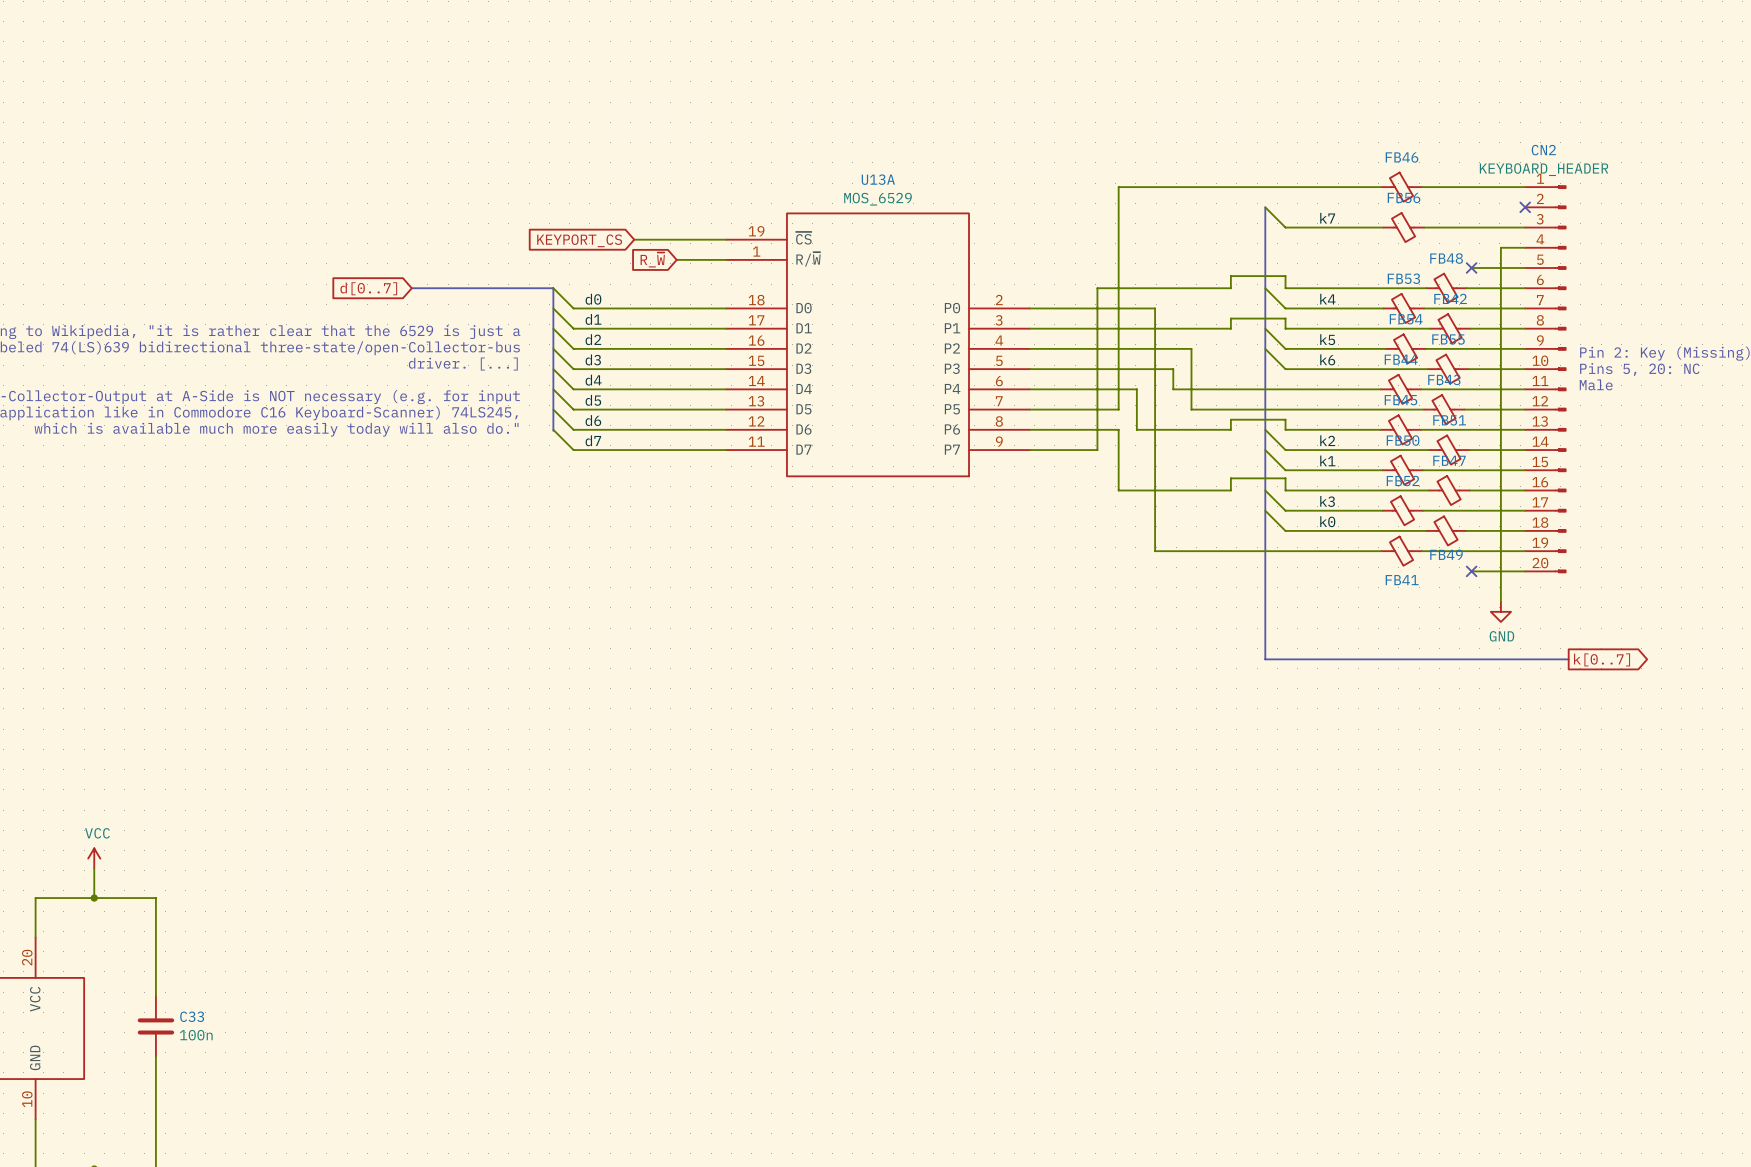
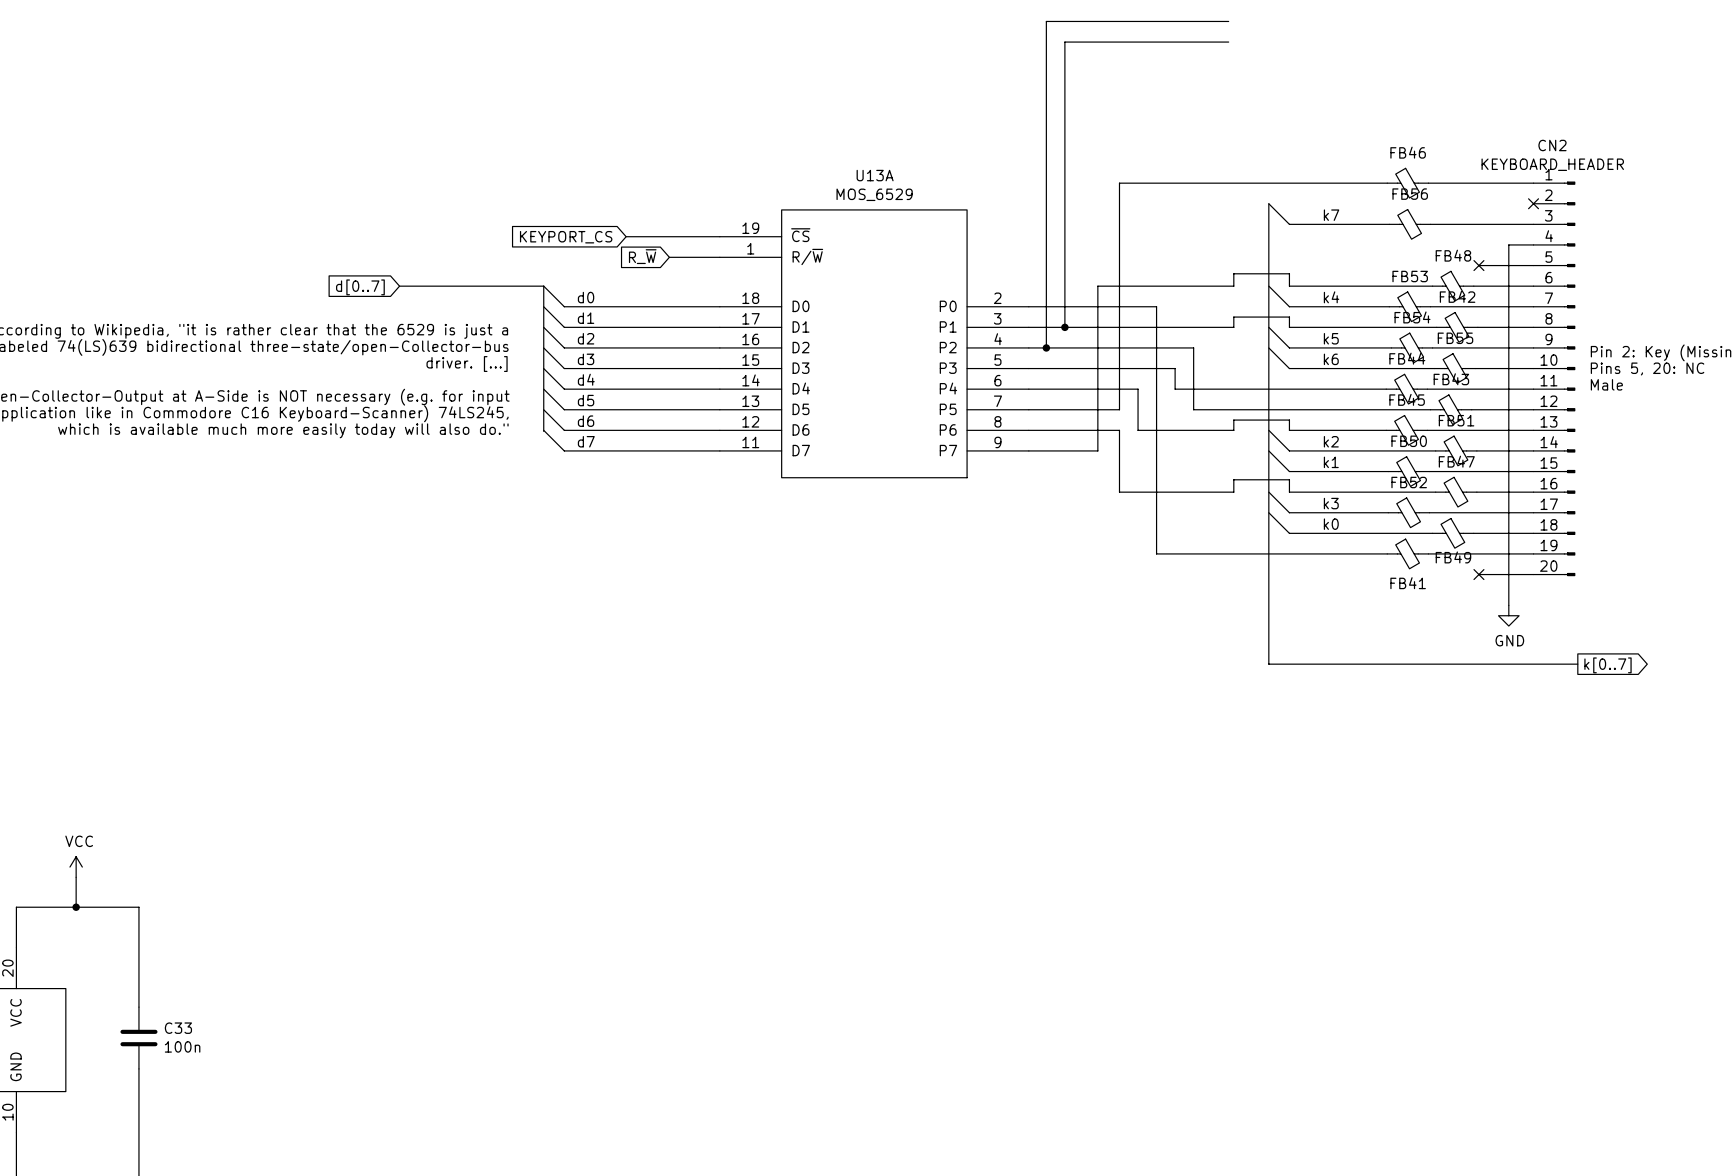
wire: none -> (1228, 21) (1046, 21) (1046, 347)
wire: none -> (1228, 42) (1064, 42) (1064, 327)
junction: none -> (1064, 327)
junction: none -> (1046, 347)

